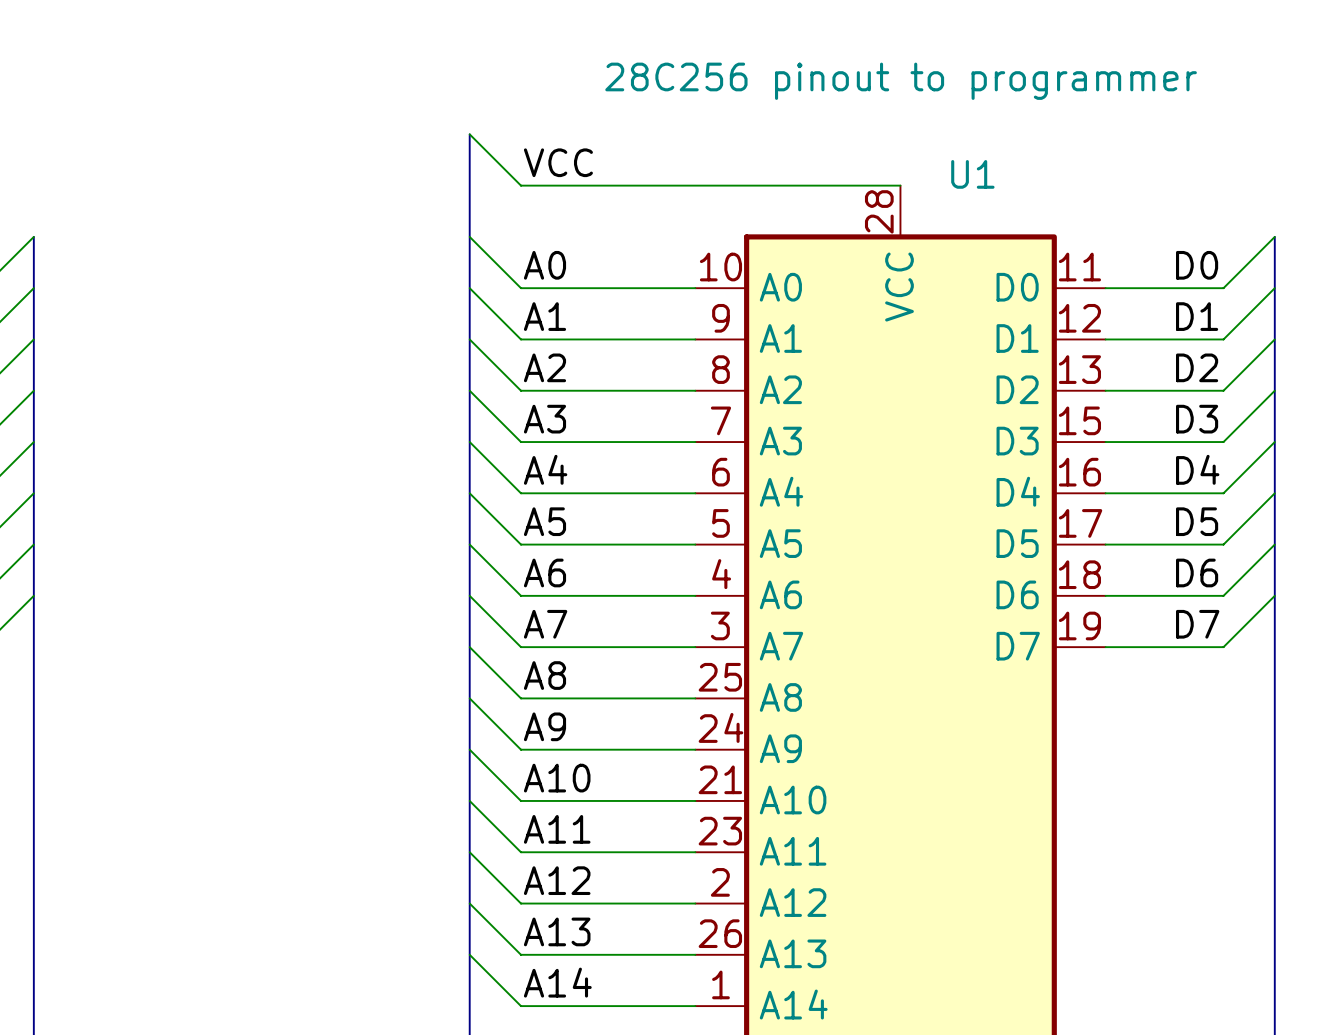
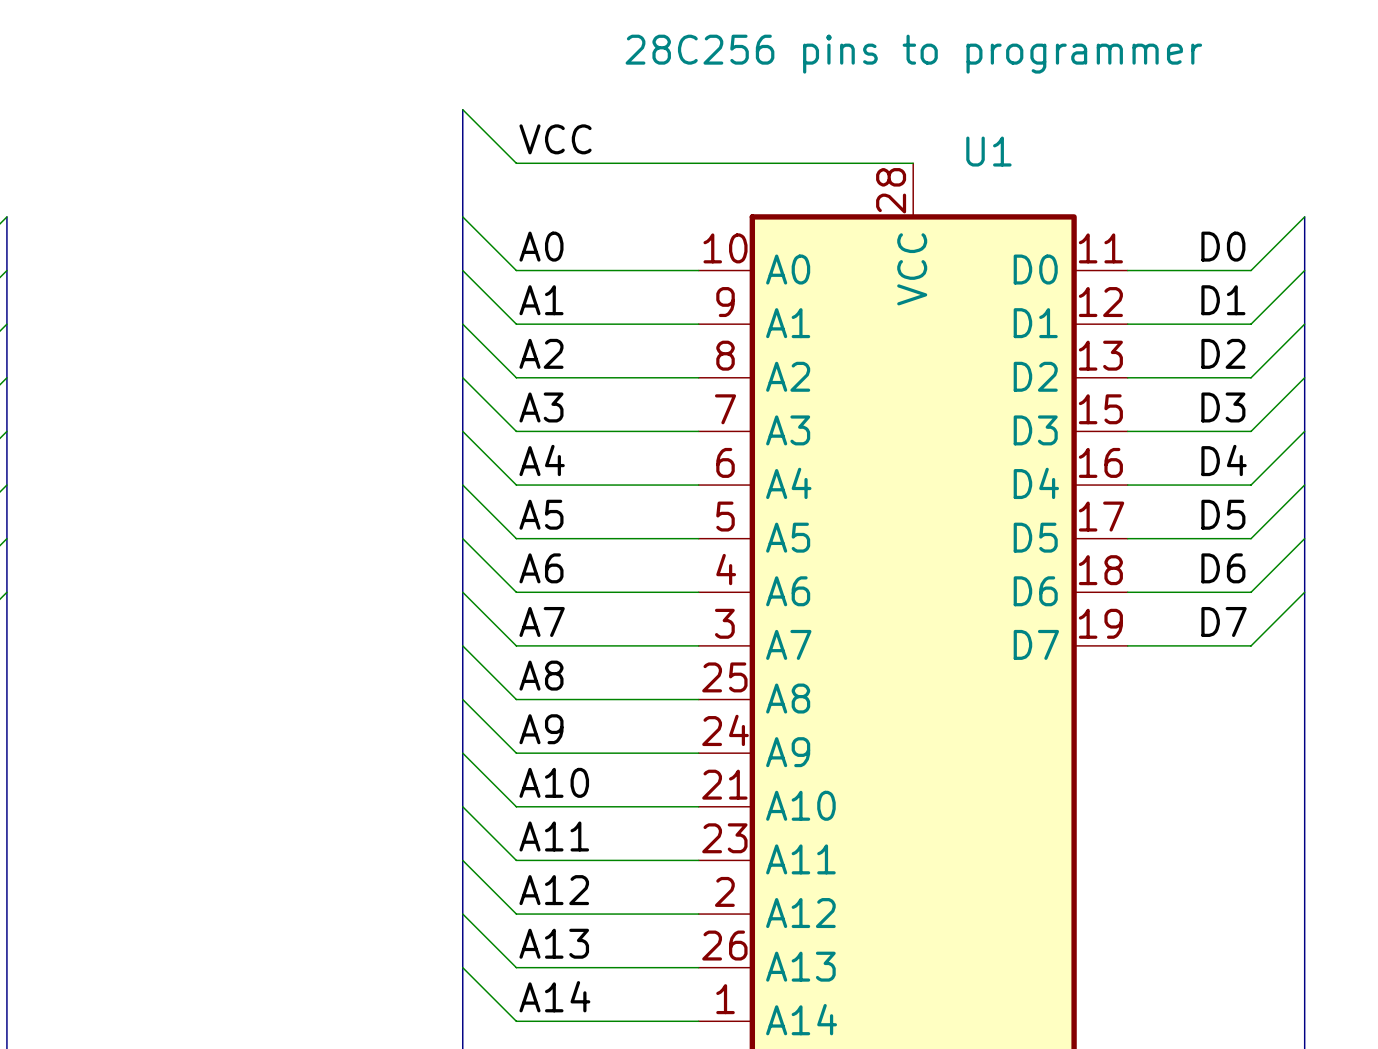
U1 value: 28C256 pinout to programmer (901, 81) -> 28C256 pins to programmer (913, 54)

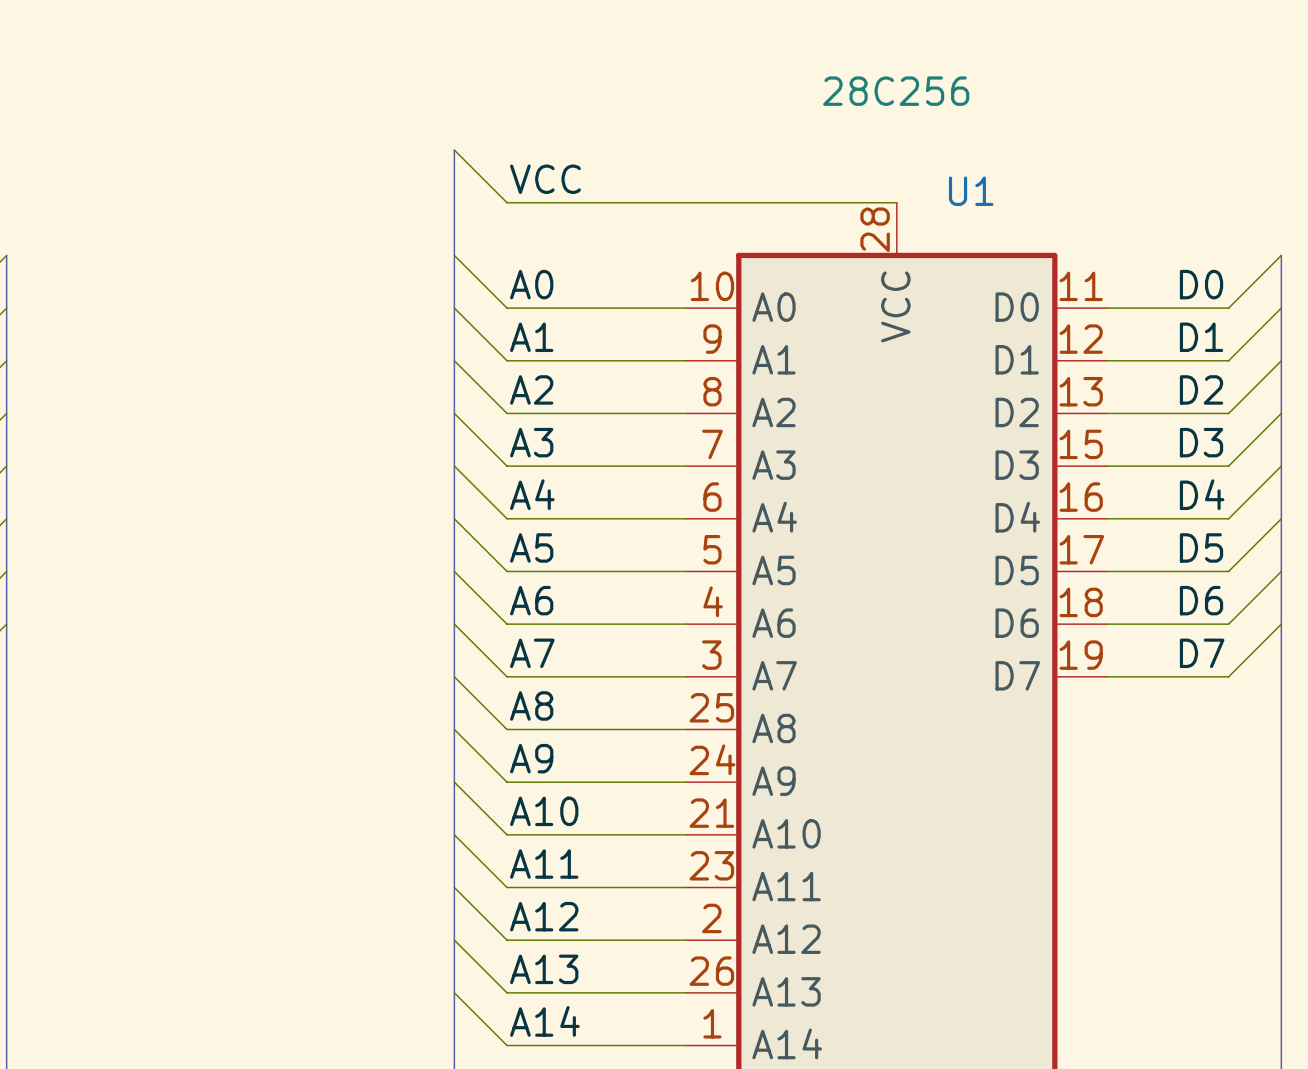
U1 value: 28C256 pins to programmer (913, 54) -> 28C256 (896, 91)

